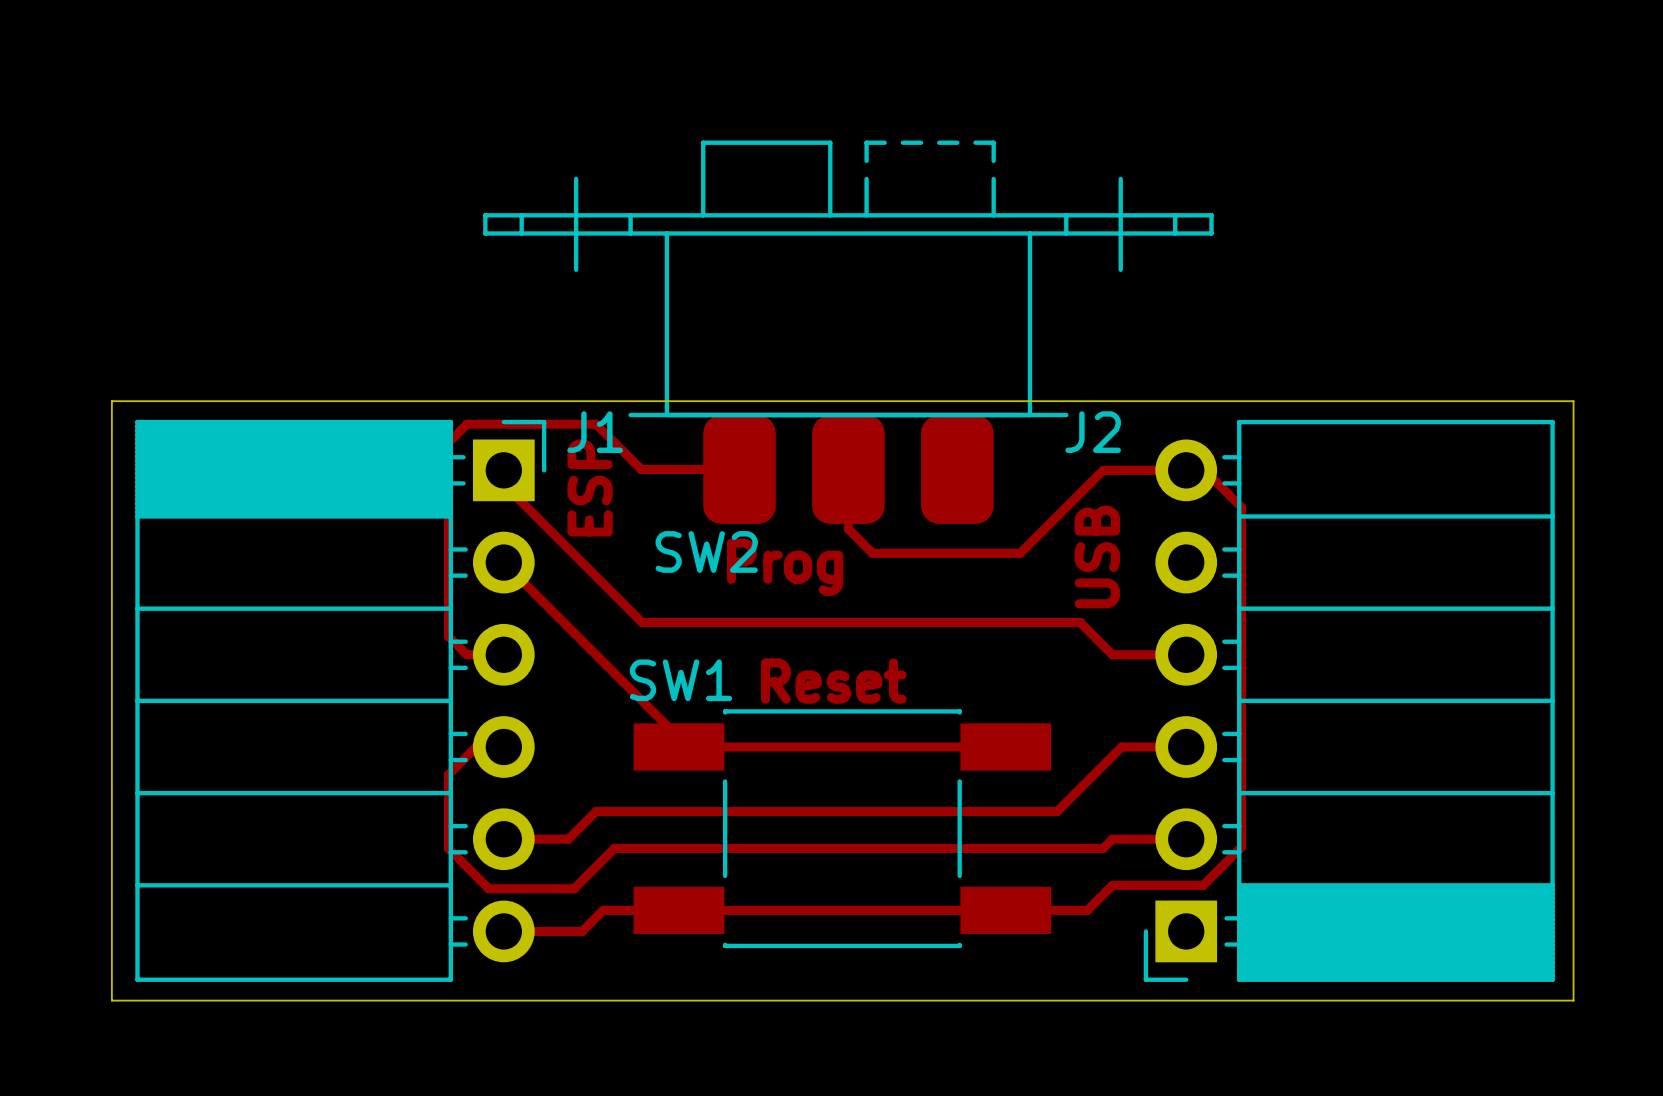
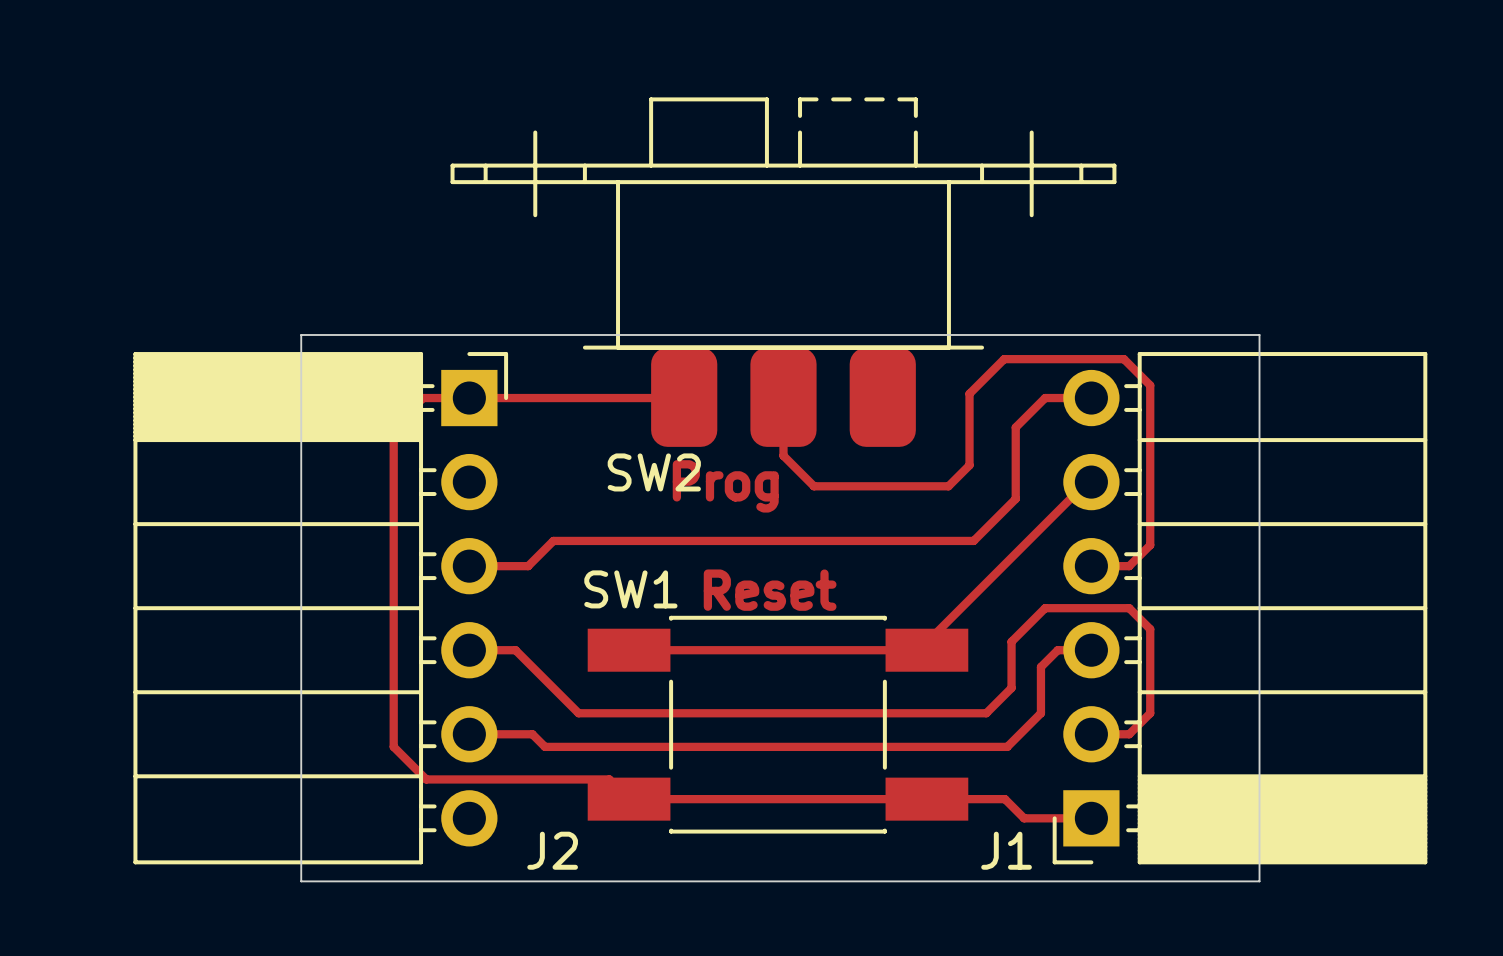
board edge: (319, 401) (111, 401) (111, 1000) (319, 1000) -> (301, 334) (301, 881)
board edge: (1370, 401) (1573, 401) (1573, 1000) (1370, 1000) -> (1259, 334) (1259, 881)
J1 name: J1 (595, 432) -> J2 (552, 850)
J2 name: J2 (1093, 432) -> J1 (1006, 850)
top track: (739, 469) (641, 469) (596, 424) (466, 424) (448, 442) (448, 636) (466, 654) (503, 654) -> (684, 397) (423, 398) (393, 427) (393, 746) (426, 779) (455, 779)
top track: (503, 470) (503, 484) (642, 622) (1080, 622) (1112, 654) (1181, 654) -> none
top track: (1135, 470) (1103, 470) (1020, 553) (872, 553) (848, 529) -> (1091, 566) (1129, 566) (1150, 545) (1150, 385) (1123, 359) (1004, 359) (969, 393) (969, 465) (948, 486) (814, 486) (783, 455) (783, 451)
top track: none -> (1045, 398) (1015, 427) (1015, 498) (973, 540) (553, 540) (528, 566) (469, 566)
top track: (1181, 470) (1204, 470) (1241, 507) (1241, 847) (1203, 885) (1112, 885) (1087, 910) -> (1087, 818) (1024, 818) (1004, 799) (1001, 799)
text: ESP (590, 487) -> none
text: USB (1097, 557) -> none
top track: (503, 562) (679, 737) (679, 747) -> none
top track: none -> (1087, 482) (926, 642) (926, 650)
top track: (503, 747) (476, 747) (448, 774) (448, 848) (488, 888) -> (469, 650) (515, 650) (578, 713) (986, 713) (1011, 688) (1011, 641) (1045, 608) (1129, 608) (1150, 629) (1150, 713) (1129, 734) (1091, 734)
top track: (1149, 747) (1121, 747) (1057, 811) (596, 811) (568, 839) -> (1057, 650) (1040, 667) (1040, 713) (1007, 746) (545, 746) (532, 734) (528, 734)
top track: (1181, 839) (1112, 839) (1103, 848) (614, 848) (574, 888) -> none
top track: (679, 910) (603, 910) (582, 931) (503, 931) -> (629, 799) (609, 779) (533, 779)

